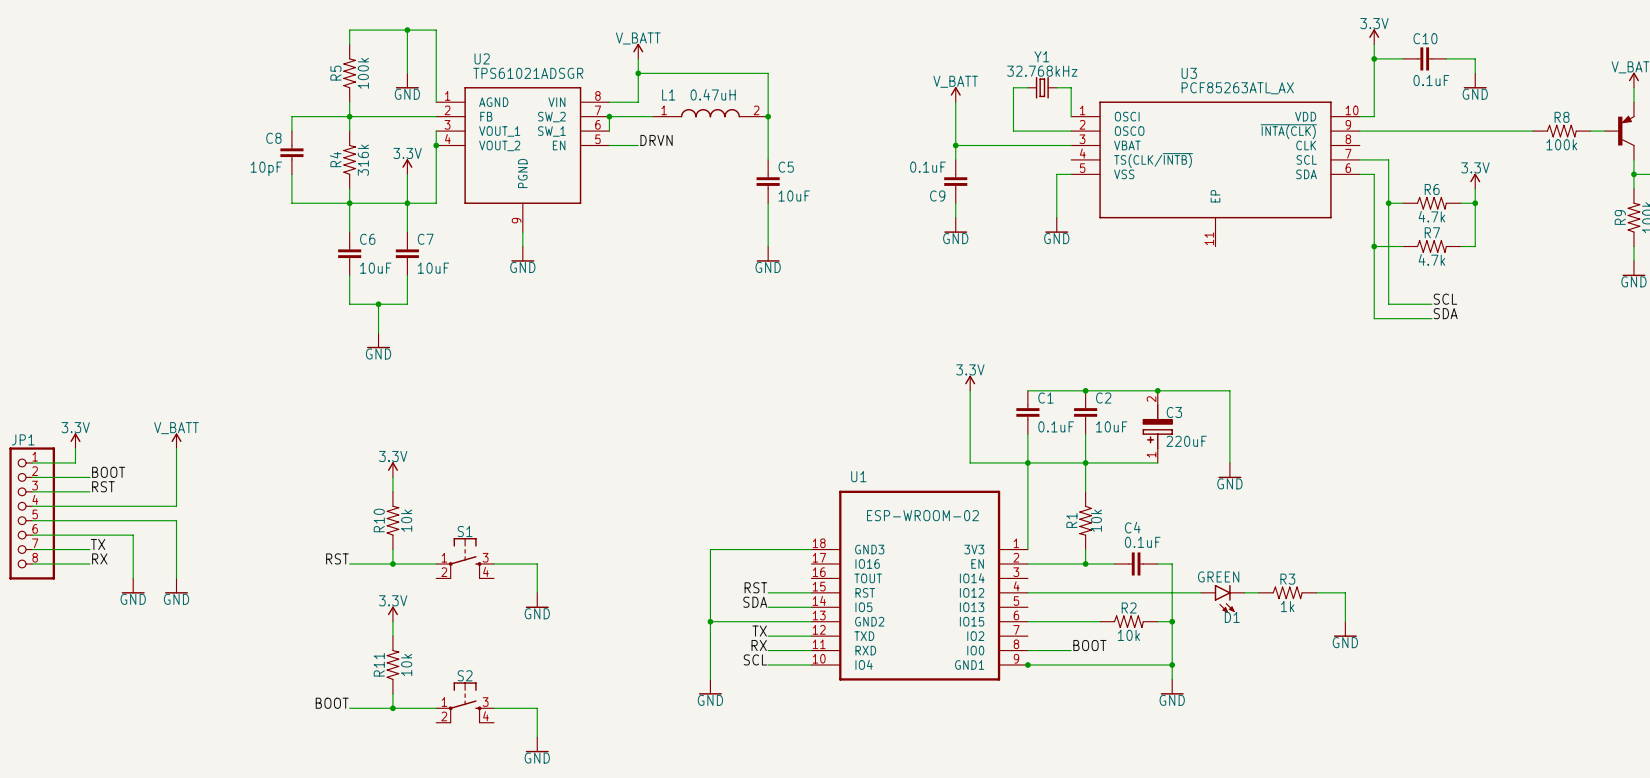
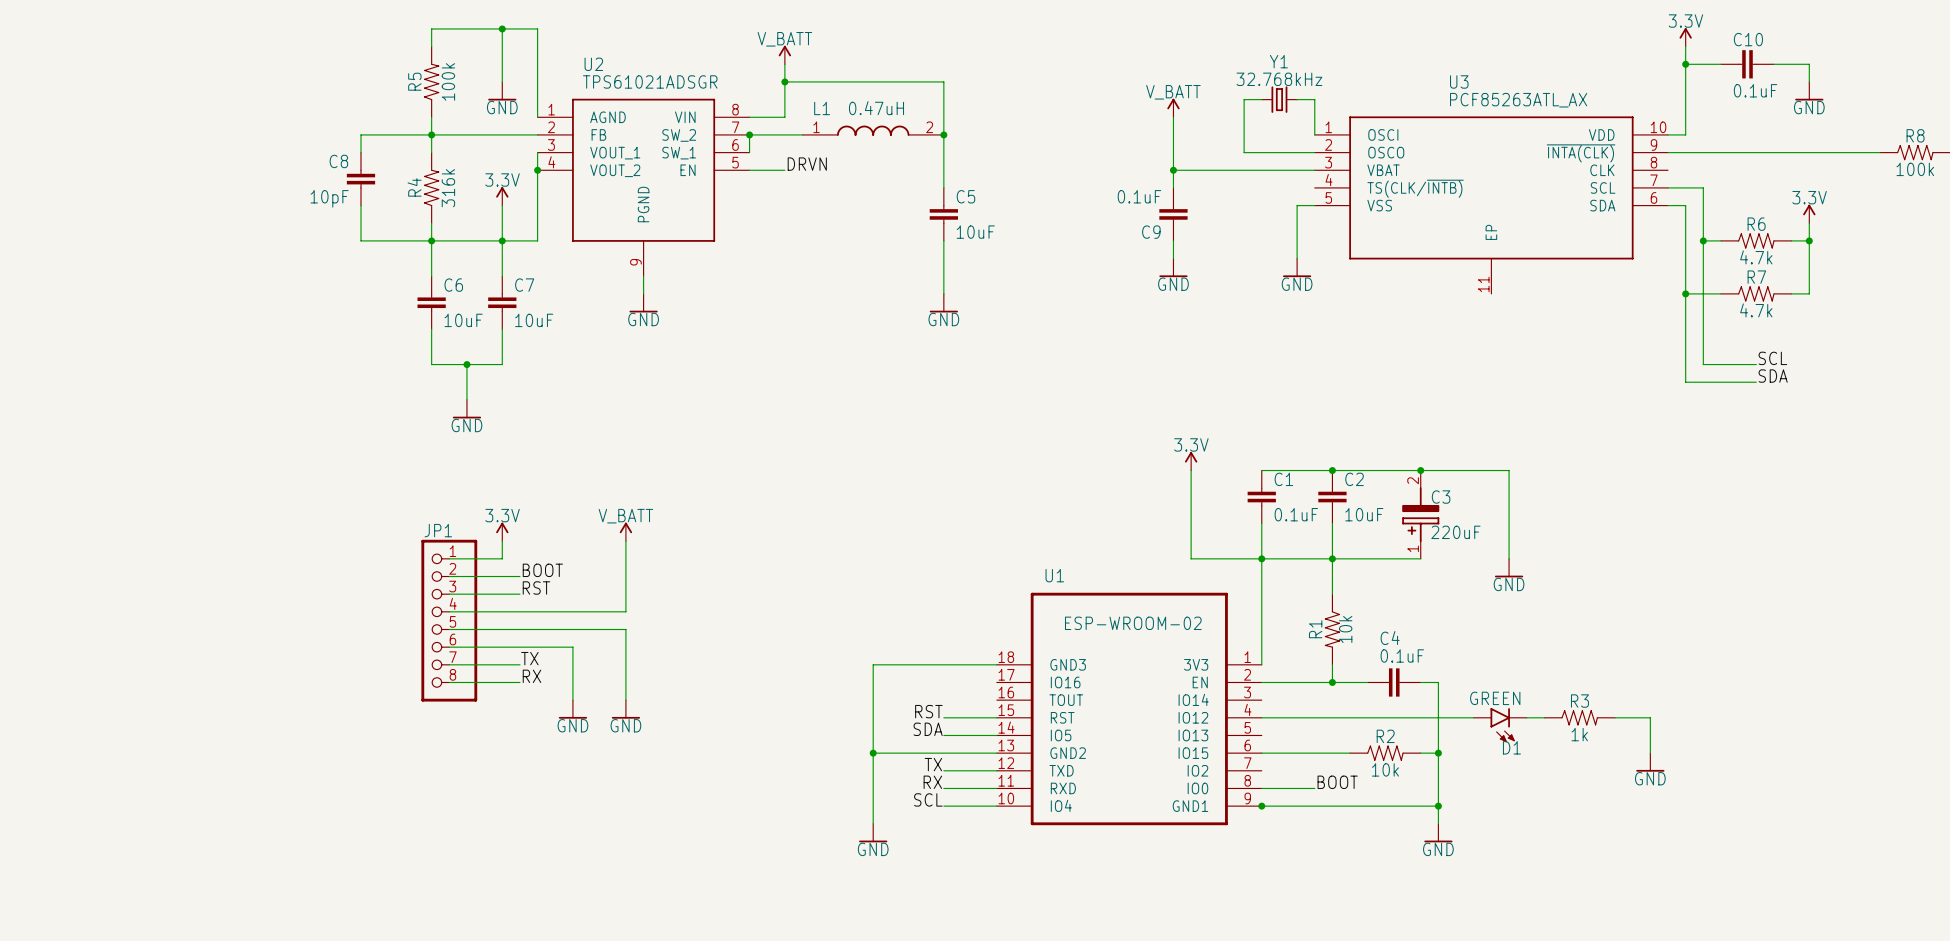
power symbol: 3.3V (75, 440) -> none
power symbol: V_BATT (176, 440) -> none
power symbol: none -> V_BATT (625, 531)
wire: (75, 448) (75, 462) (32, 462) -> none
wire: (176, 448) (176, 506) (32, 506) -> none
wire: none -> (502, 541) (502, 558) (449, 558)
wire: none -> (625, 541) (625, 611) (449, 611)
power symbol position: 3.3V (392, 469) -> 3.3V (502, 531)
label: BOOT (108, 472) -> none
label: none -> BOOT (542, 570)
wire: (32, 477) (89, 477) -> none
wire: none -> (449, 576) (519, 576)
wire: (392, 477) (392, 491) -> none
label: RST (103, 486) -> none
wire: (32, 491) (89, 491) -> none
wire: none -> (449, 594) (519, 594)
JP1 position: (32, 513) -> (449, 620)
wire: (32, 520) (176, 520) (176, 578) -> none
wire: none -> (449, 629) (625, 629) (625, 700)
R10: 10k (392, 520) -> none
wire: (32, 535) (133, 535) (133, 578) -> none
wire: none -> (449, 647) (572, 647) (572, 700)
label: TX (98, 544) -> none
label: none -> TX (529, 658)
wire: (32, 549) (89, 549) -> none
wire: none -> (449, 664) (519, 664)
wire: (392, 549) (392, 563) -> none
label: RX (99, 558) -> none
label position: RST (337, 558) -> RST (536, 587)
label: none -> RX (531, 676)
S1: (465, 558) -> none
wire: (32, 563) (89, 563) -> none
junction: (392, 563) -> none
wire: (421, 563) (436, 563) -> none
wire: (493, 563) (537, 563) (537, 592) -> none
power symbol: GND (133, 585) -> none
power symbol: GND (176, 585) -> none
power symbol: none -> GND (572, 709)
power symbol position: GND (537, 600) -> GND (625, 709)
power symbol: 3.3V (392, 614) -> none
wire: (392, 621) (392, 636) -> none
R11: 10k (392, 665) -> none
wire: (392, 693) (392, 708) -> none
S2: (465, 702) -> none
label: BOOT (332, 703) -> none
wire: (349, 708) (436, 708) -> none
junction: (392, 708) -> none
wire: (493, 708) (537, 708) (537, 737) -> none
power symbol: GND (537, 744) -> none

